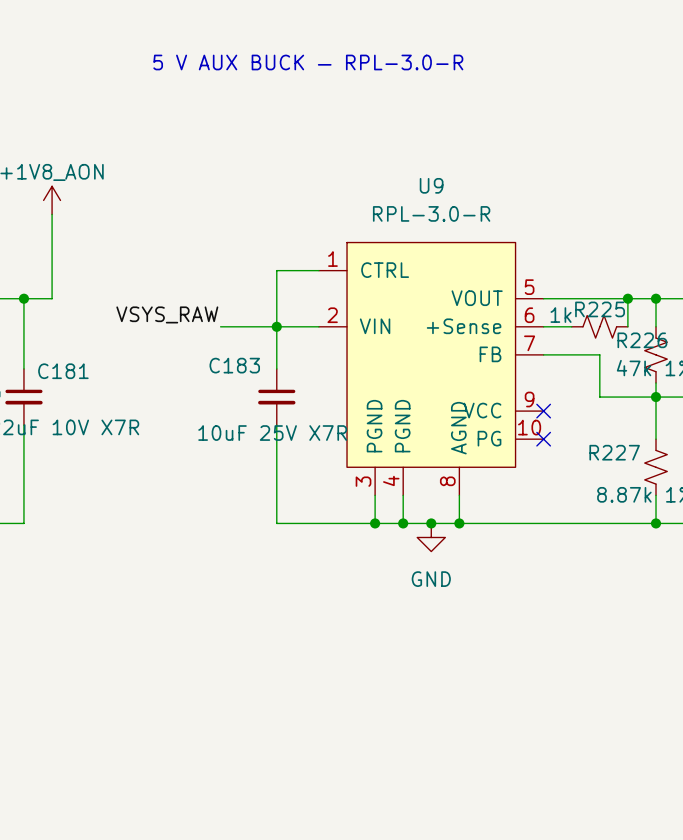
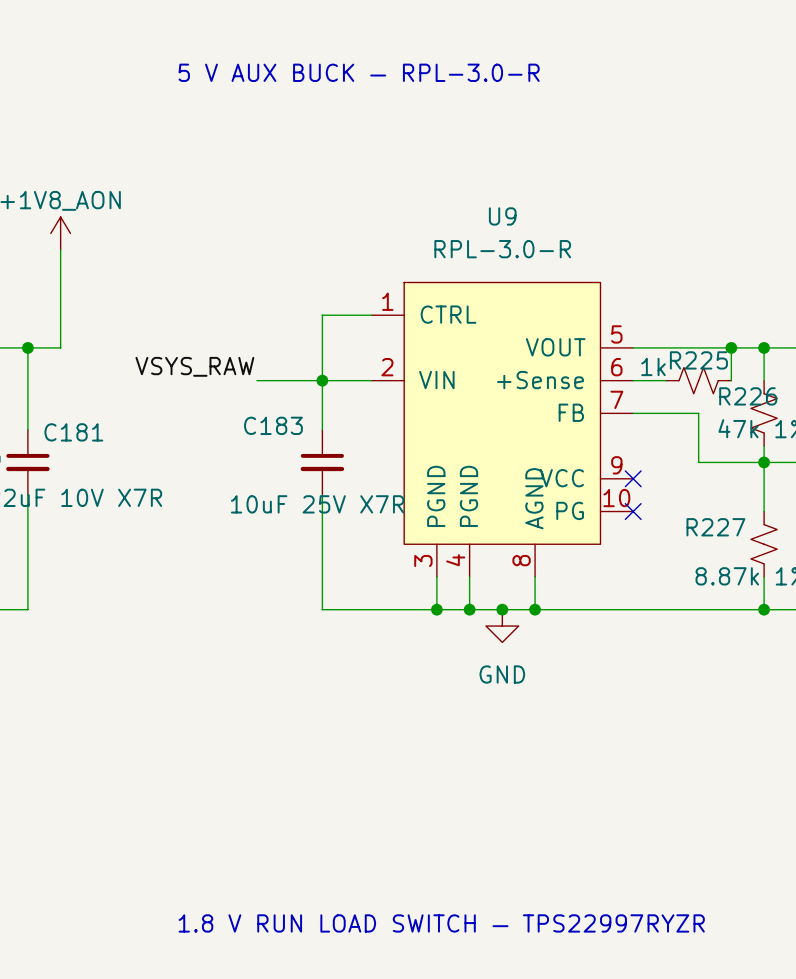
text: none -> 1.8 V RUN LOAD SWITCH — TPS22997RYZR (441, 923)

